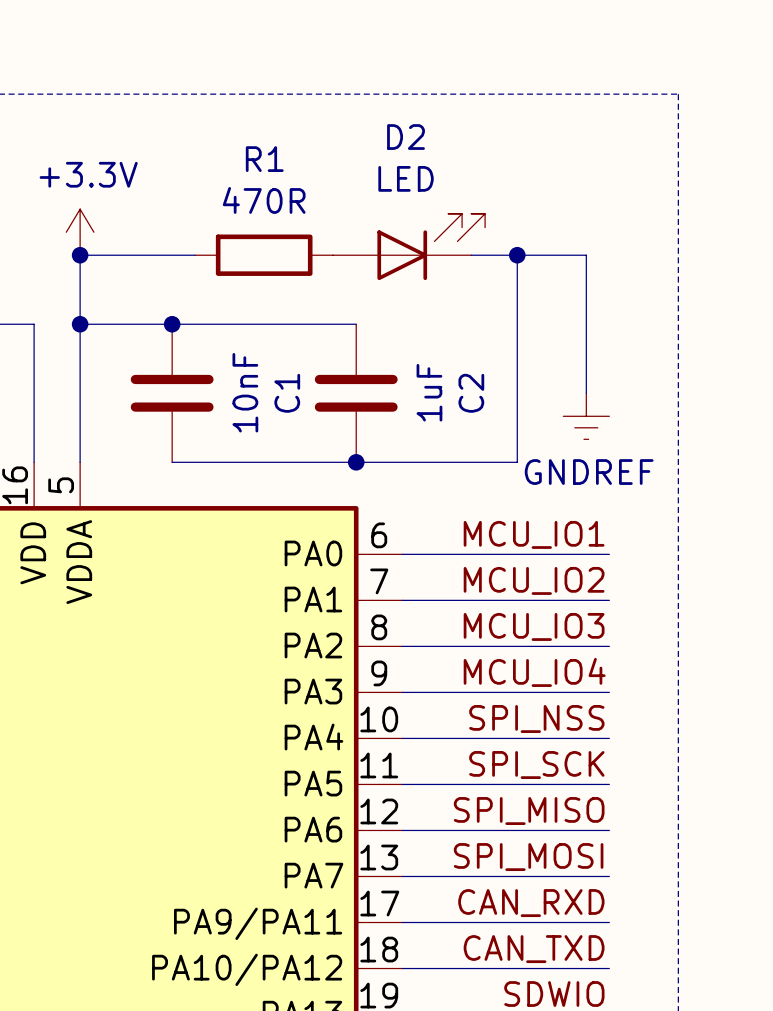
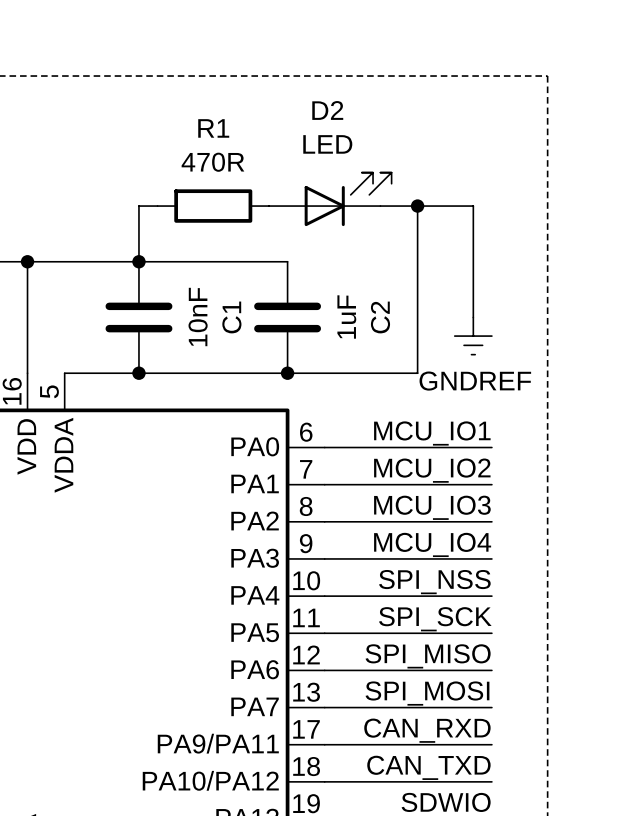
power symbol: +3.3V (80, 232) -> none
junction: (80, 255) -> none
wire: (172, 255) (80, 255) (80, 462) -> (138, 206) (138, 261)
wire: none -> (27, 261) (64, 261)
junction: none -> (27, 261)
junction: (80, 324) -> none
wire: none -> (64, 373) (138, 373)
junction: none -> (138, 373)

